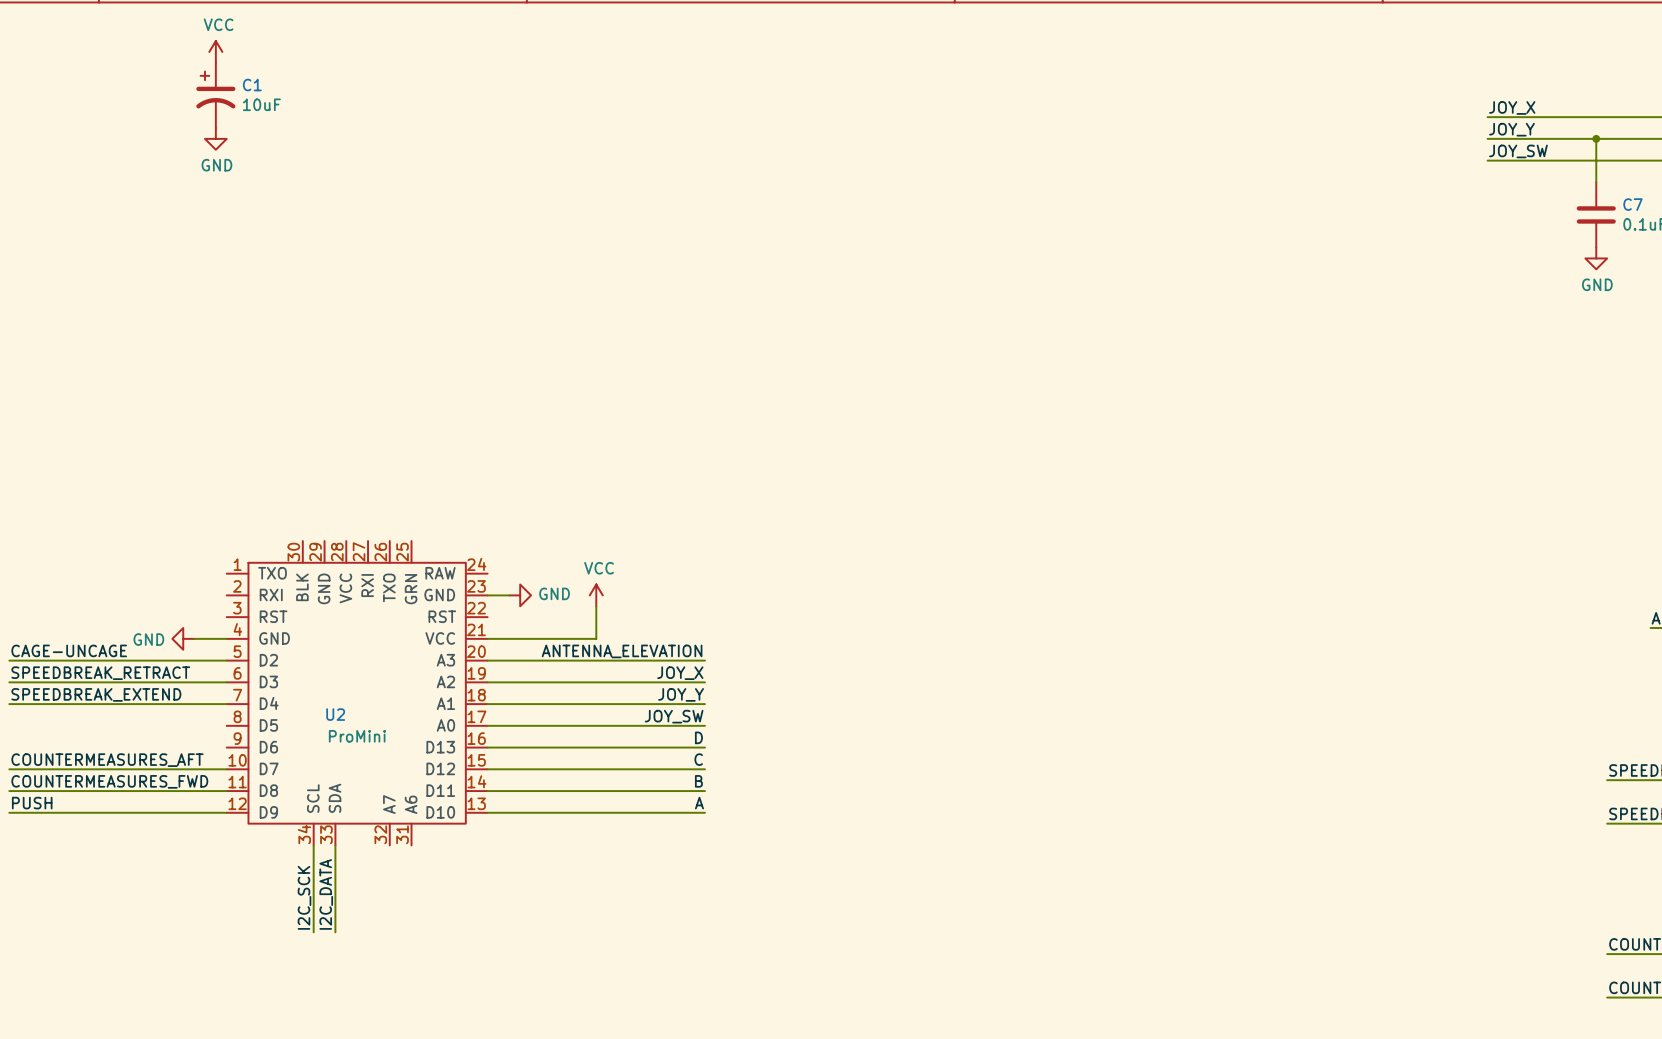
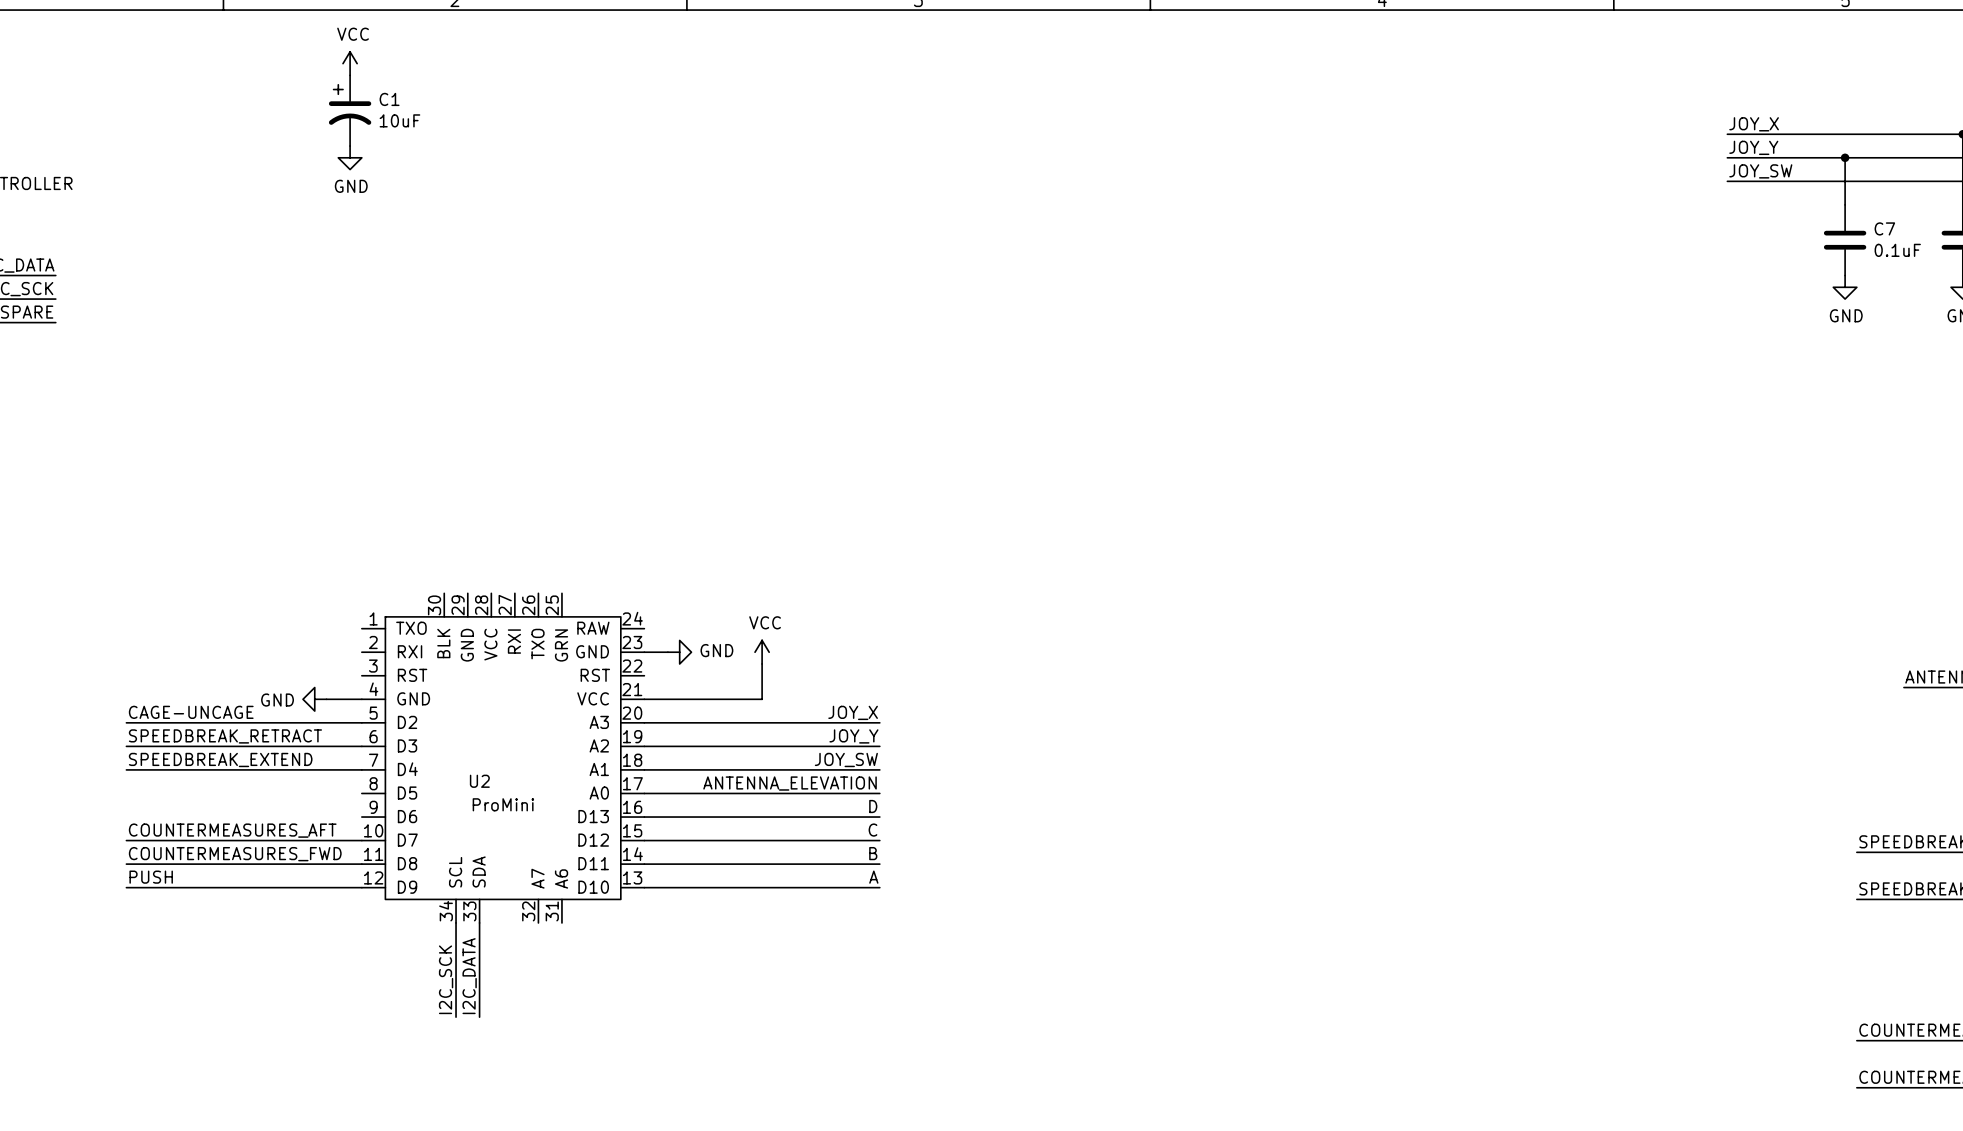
label: ANTENNA_ELEVATION (622, 651) -> JOY_X (853, 712)
label: JOY_X (680, 673) -> JOY_Y (853, 736)
label: JOY_Y (681, 694) -> JOY_SW (846, 759)
label: JOY_SW (674, 716) -> ANTENNA_ELEVATION (790, 783)

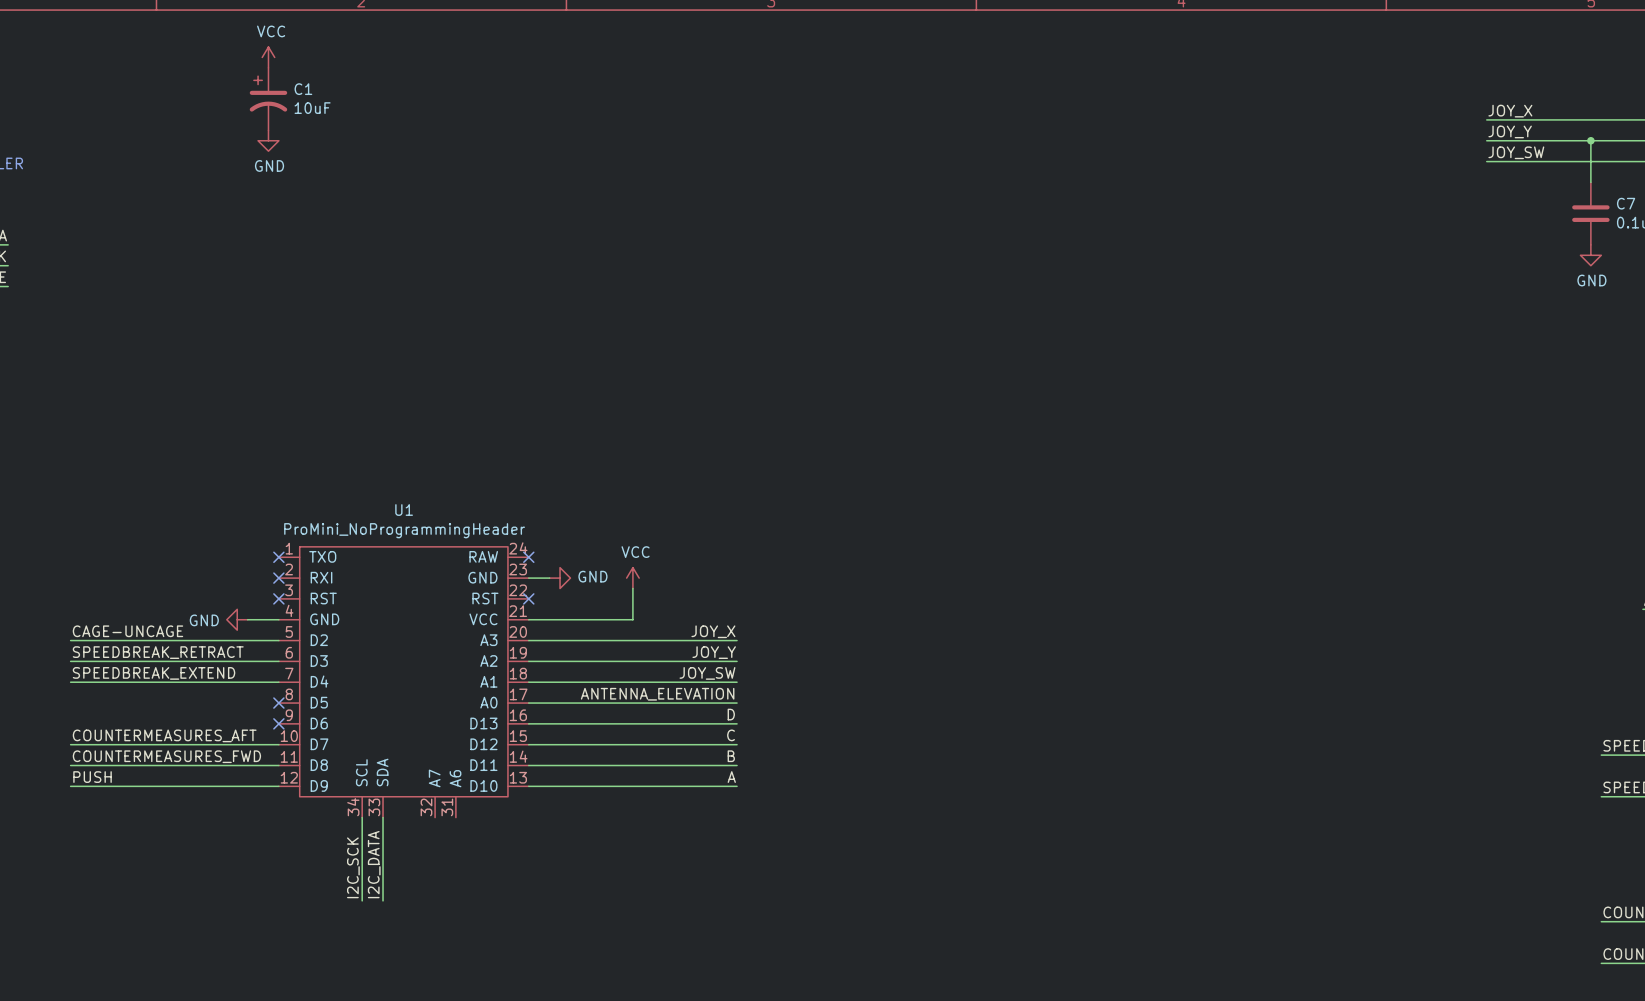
no-connect mark: none -> (278, 557)
no-connect mark: none -> (528, 557)
no-connect mark: none -> (278, 578)
no-connect mark: none -> (278, 598)
no-connect mark: none -> (528, 598)
U2: ProMini (503, 758) -> none
U1: none -> ProMini_NoProgrammingHeader (403, 682)
no-connect mark: none -> (278, 703)
no-connect mark: none -> (278, 723)

